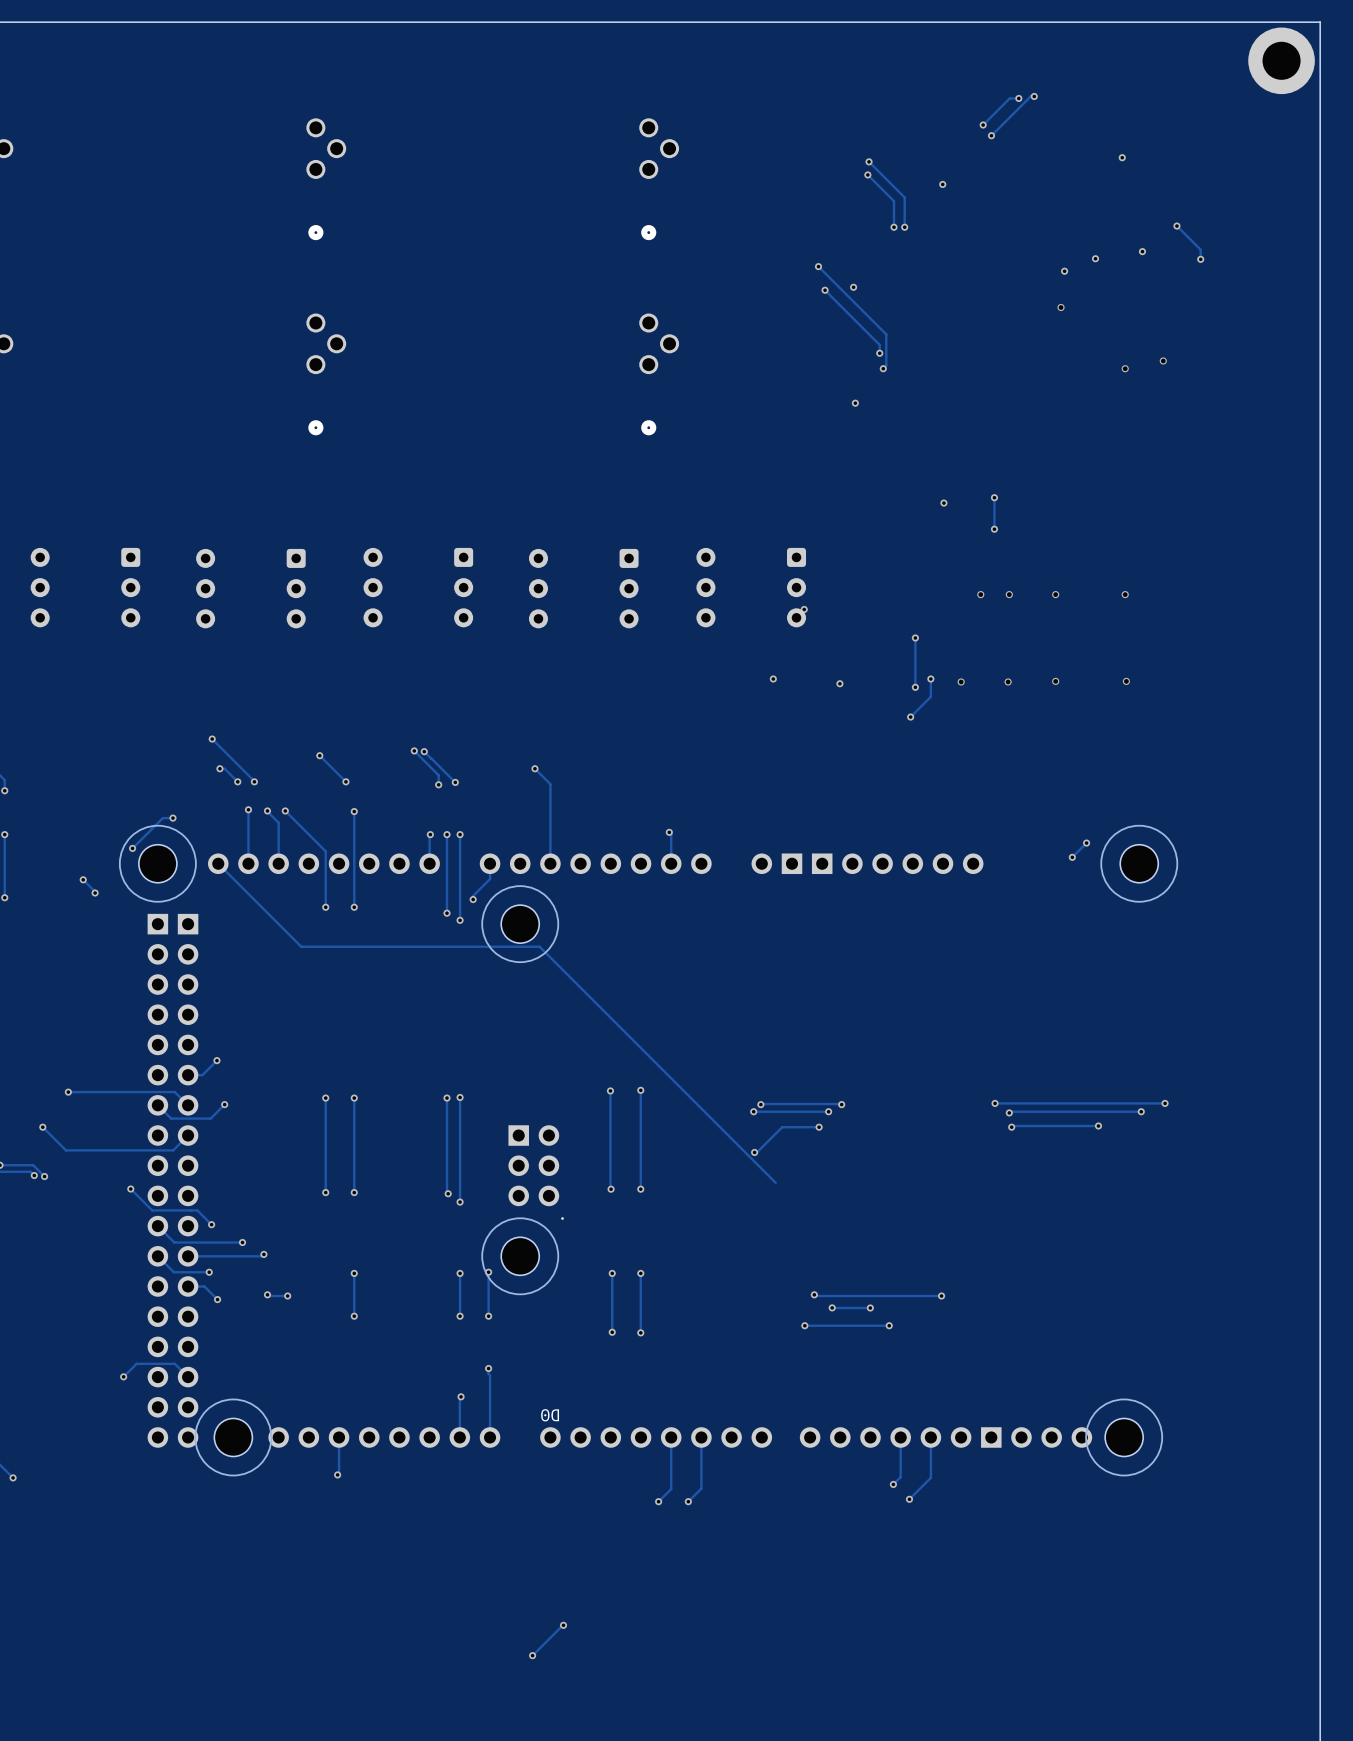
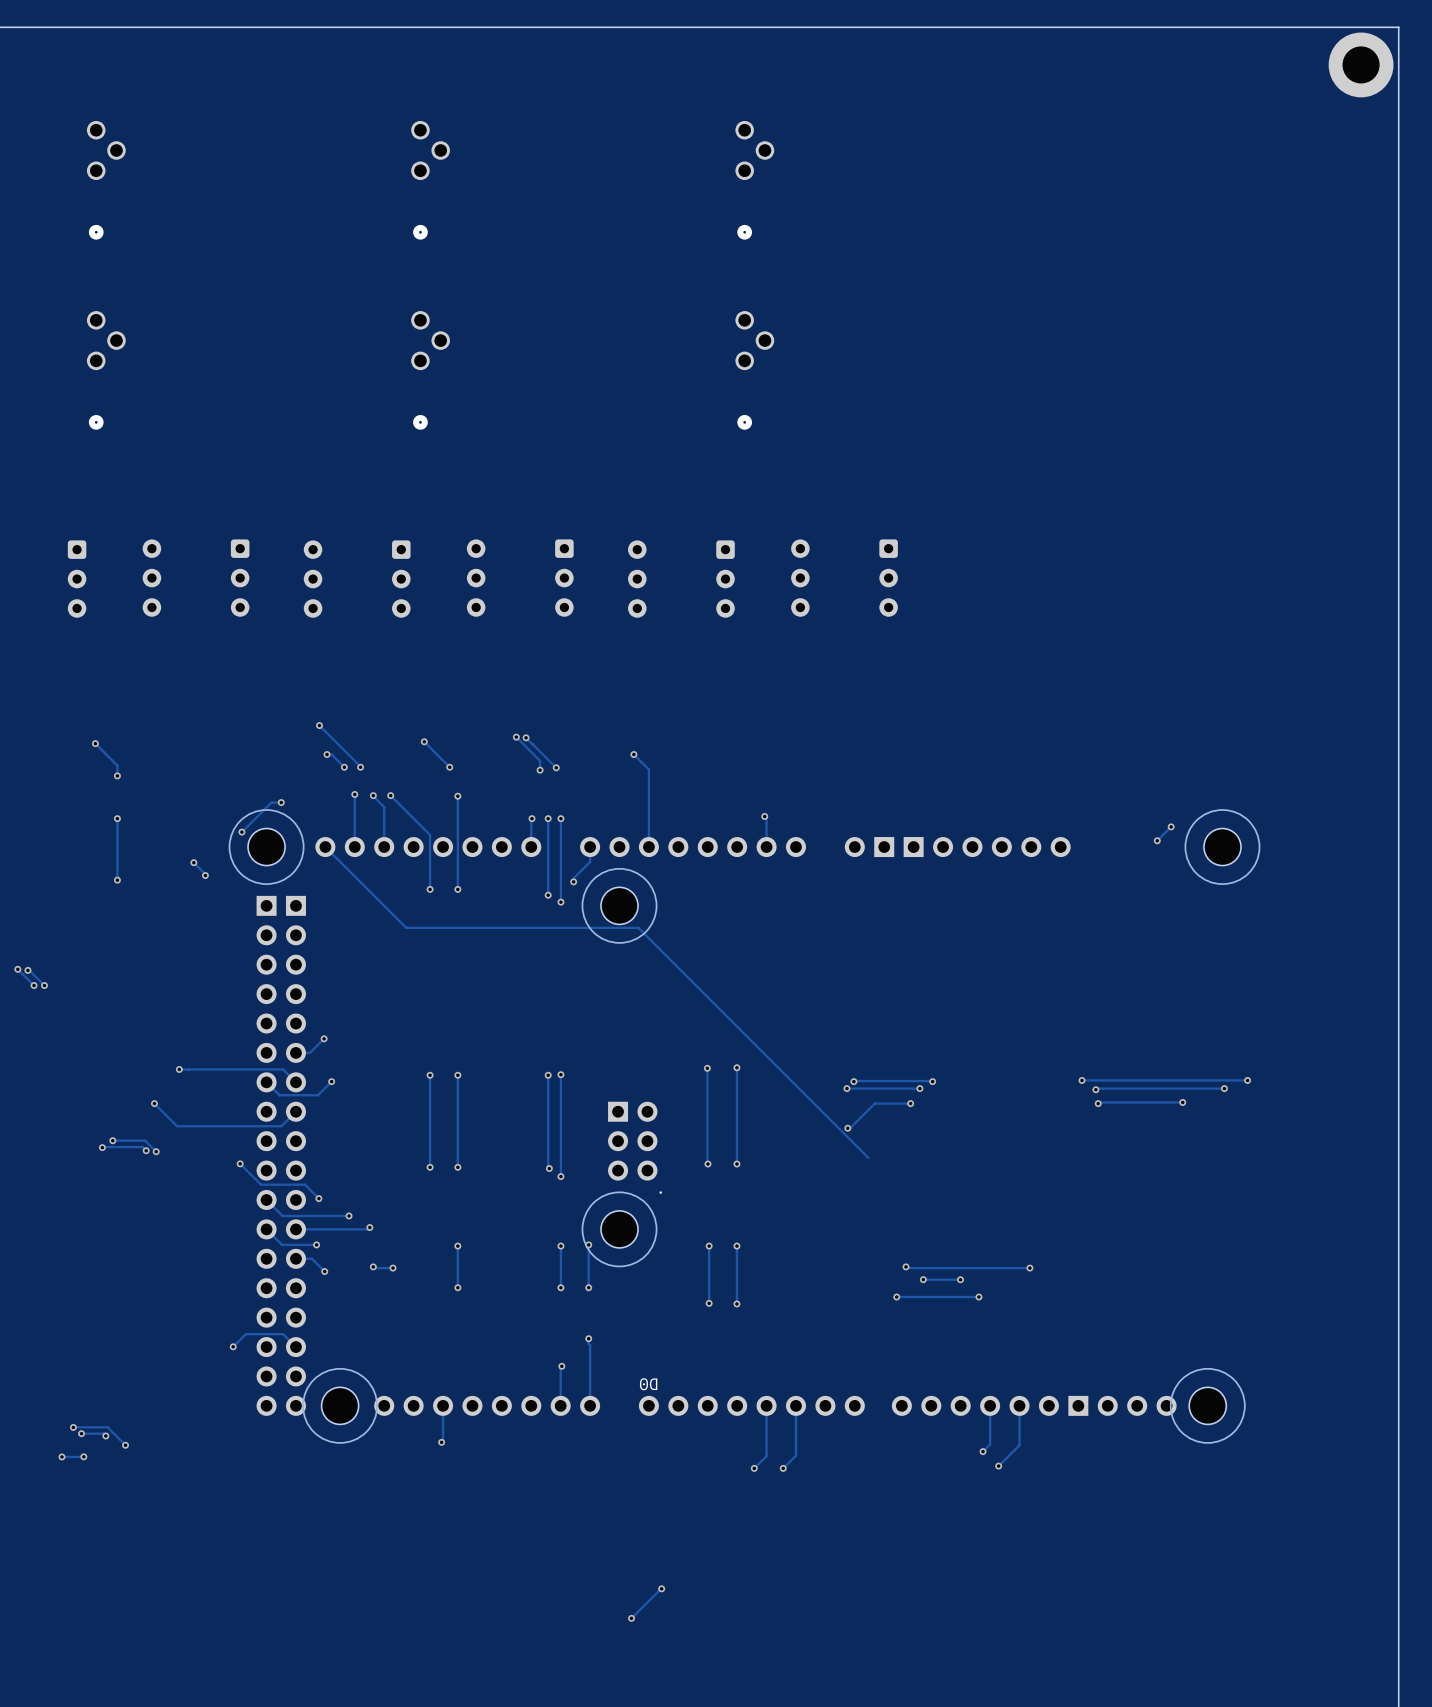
track: (1034, 96) (1030, 96) (991, 135) -> none
via: (1034, 96) -> none
track: (1018, 98) (1009, 98) (983, 125) -> none
via: (1018, 98) -> none
via: (983, 125) -> none
via: (991, 135) -> none
via: (1122, 157) -> none
track: (869, 161) (904, 197) (904, 227) -> none
via: (869, 161) -> none
track: (867, 174) (894, 201) (894, 227) -> none
via: (867, 174) -> none
via: (942, 184) -> none
track: (1176, 226) (1200, 249) (1200, 259) -> none
via: (1176, 226) -> none
via: (894, 227) -> none
via: (904, 227) -> none
via: (1142, 251) -> none
via: (1095, 258) -> none
via: (1200, 259) -> none
track: (818, 266) (886, 334) (886, 365) (883, 368) -> none
via: (818, 266) -> none
via: (1064, 271) -> none
via: (853, 287) -> none
track: (825, 290) (879, 344) (879, 353) -> none
via: (825, 290) -> none
via: (1061, 307) -> none
via: (879, 353) -> none
via: (1163, 360) -> none
via: (883, 368) -> none
via: (1125, 368) -> none
via: (855, 403) -> none
track: (994, 497) (994, 529) -> none
via: (994, 497) -> none
via: (943, 503) -> none
via: (994, 529) -> none
via: (980, 594) -> none
via: (1009, 594) -> none
via: (1055, 594) -> none
via: (1125, 594) -> none
via: (804, 609) -> none
track: (915, 637) (915, 687) -> none
via: (915, 637) -> none
via: (773, 679) -> none
track: (930, 679) (930, 696) (910, 717) -> none
via: (930, 679) -> none
via: (961, 681) -> none
via: (1008, 681) -> none
via: (1055, 681) -> none
via: (1126, 681) -> none
via: (839, 683) -> none
via: (915, 687) -> none
via: (910, 717) -> none

